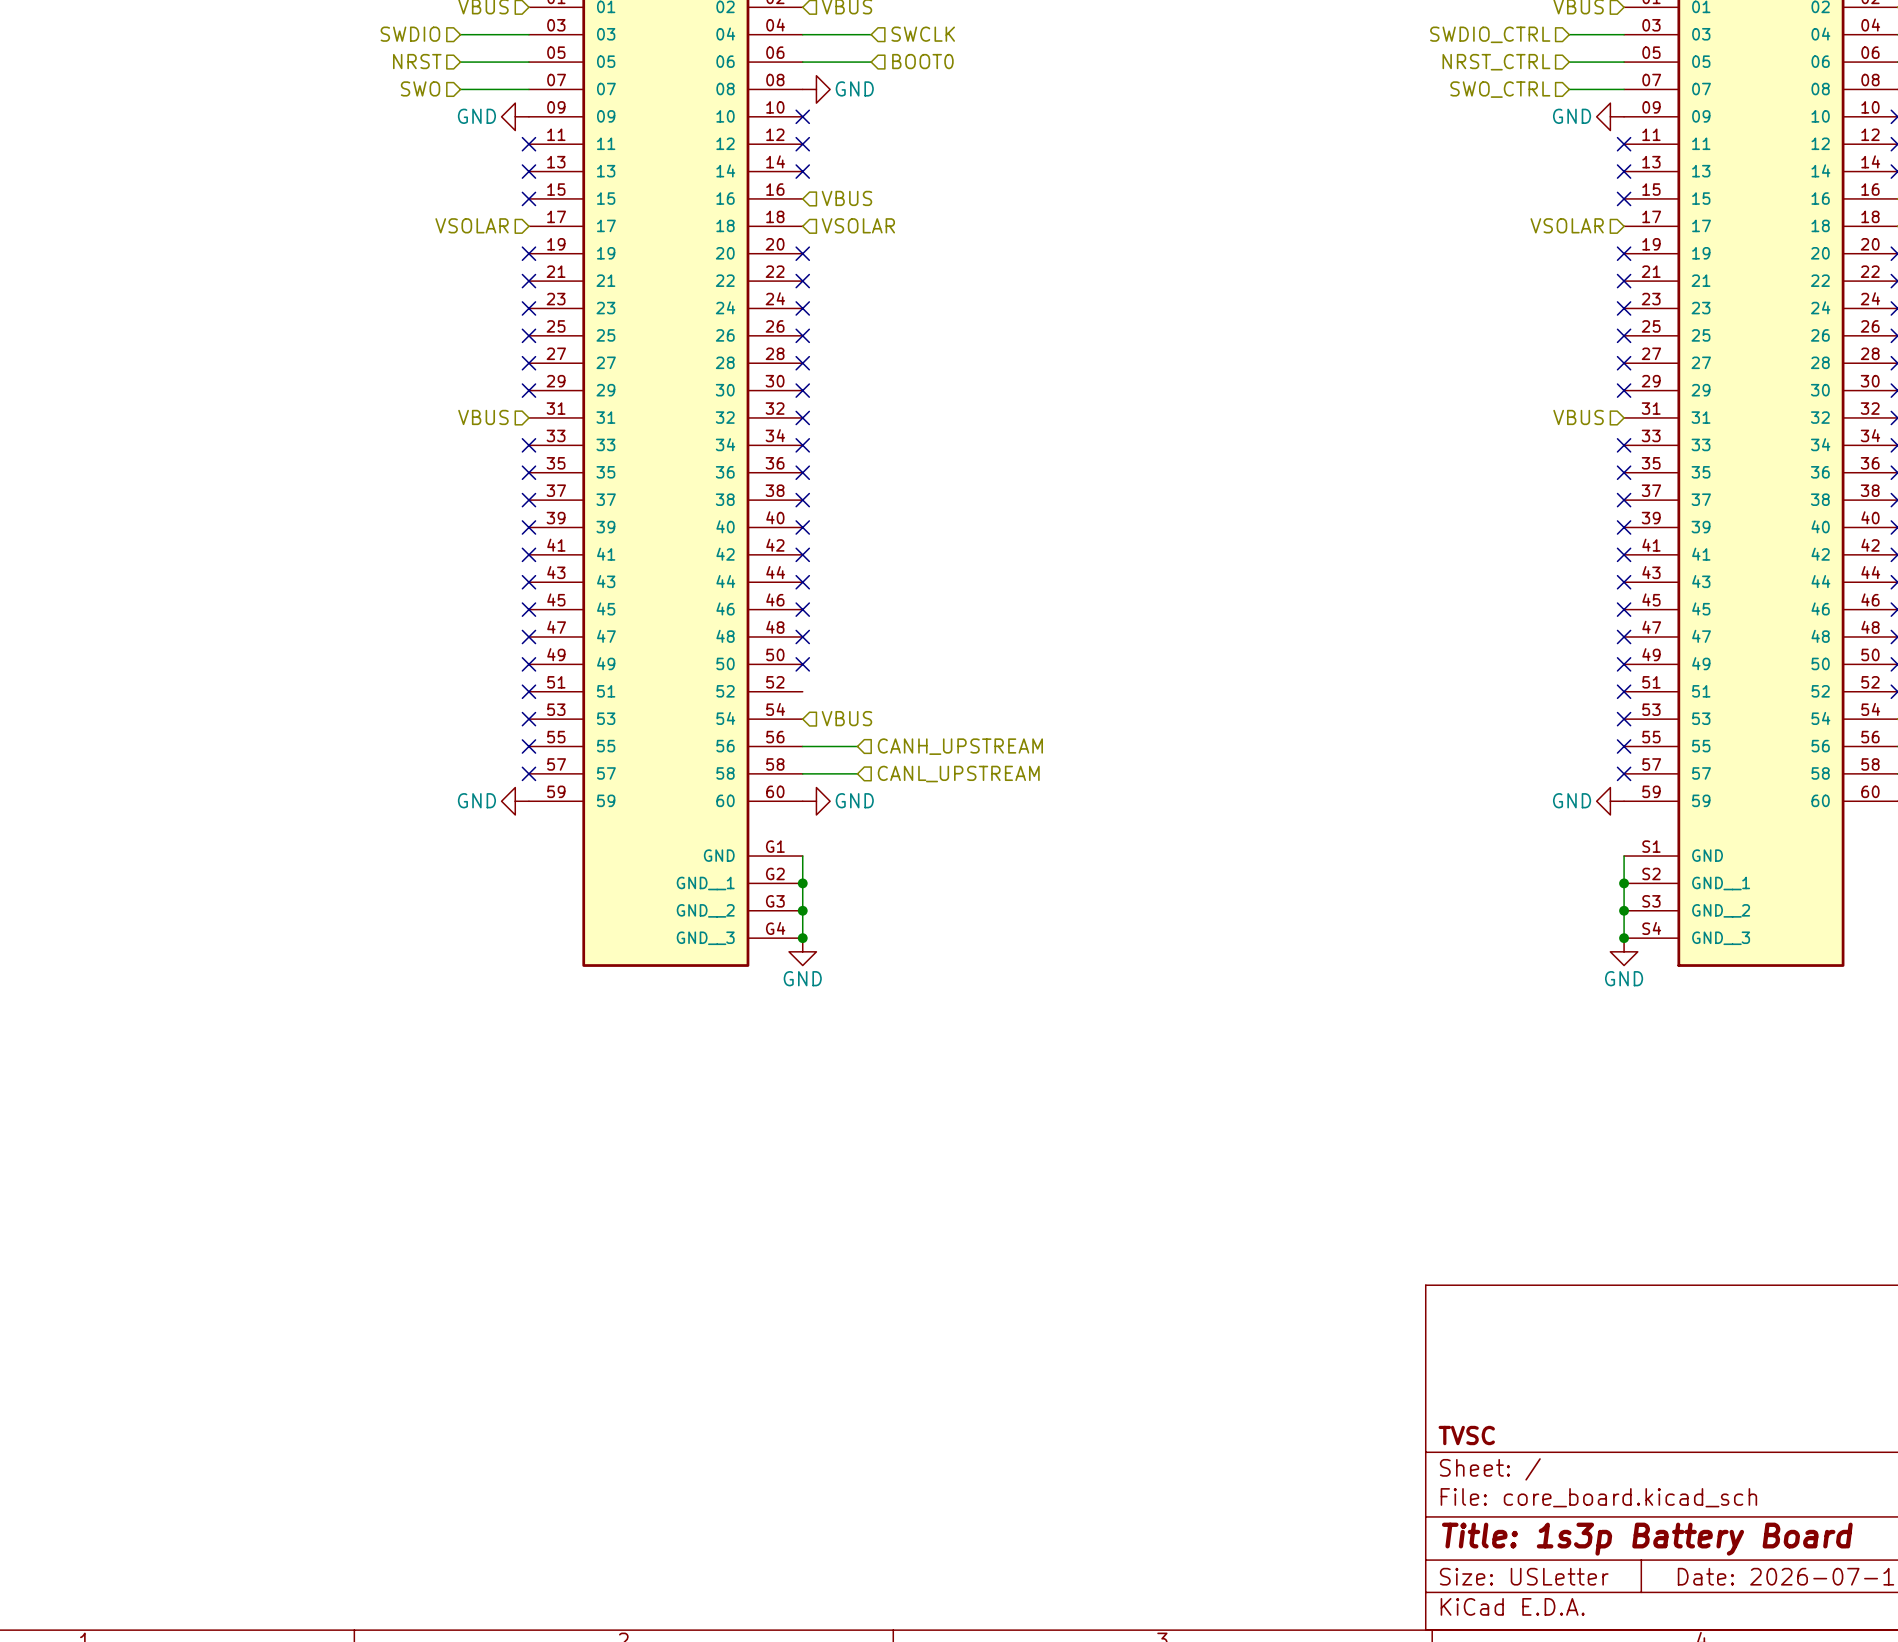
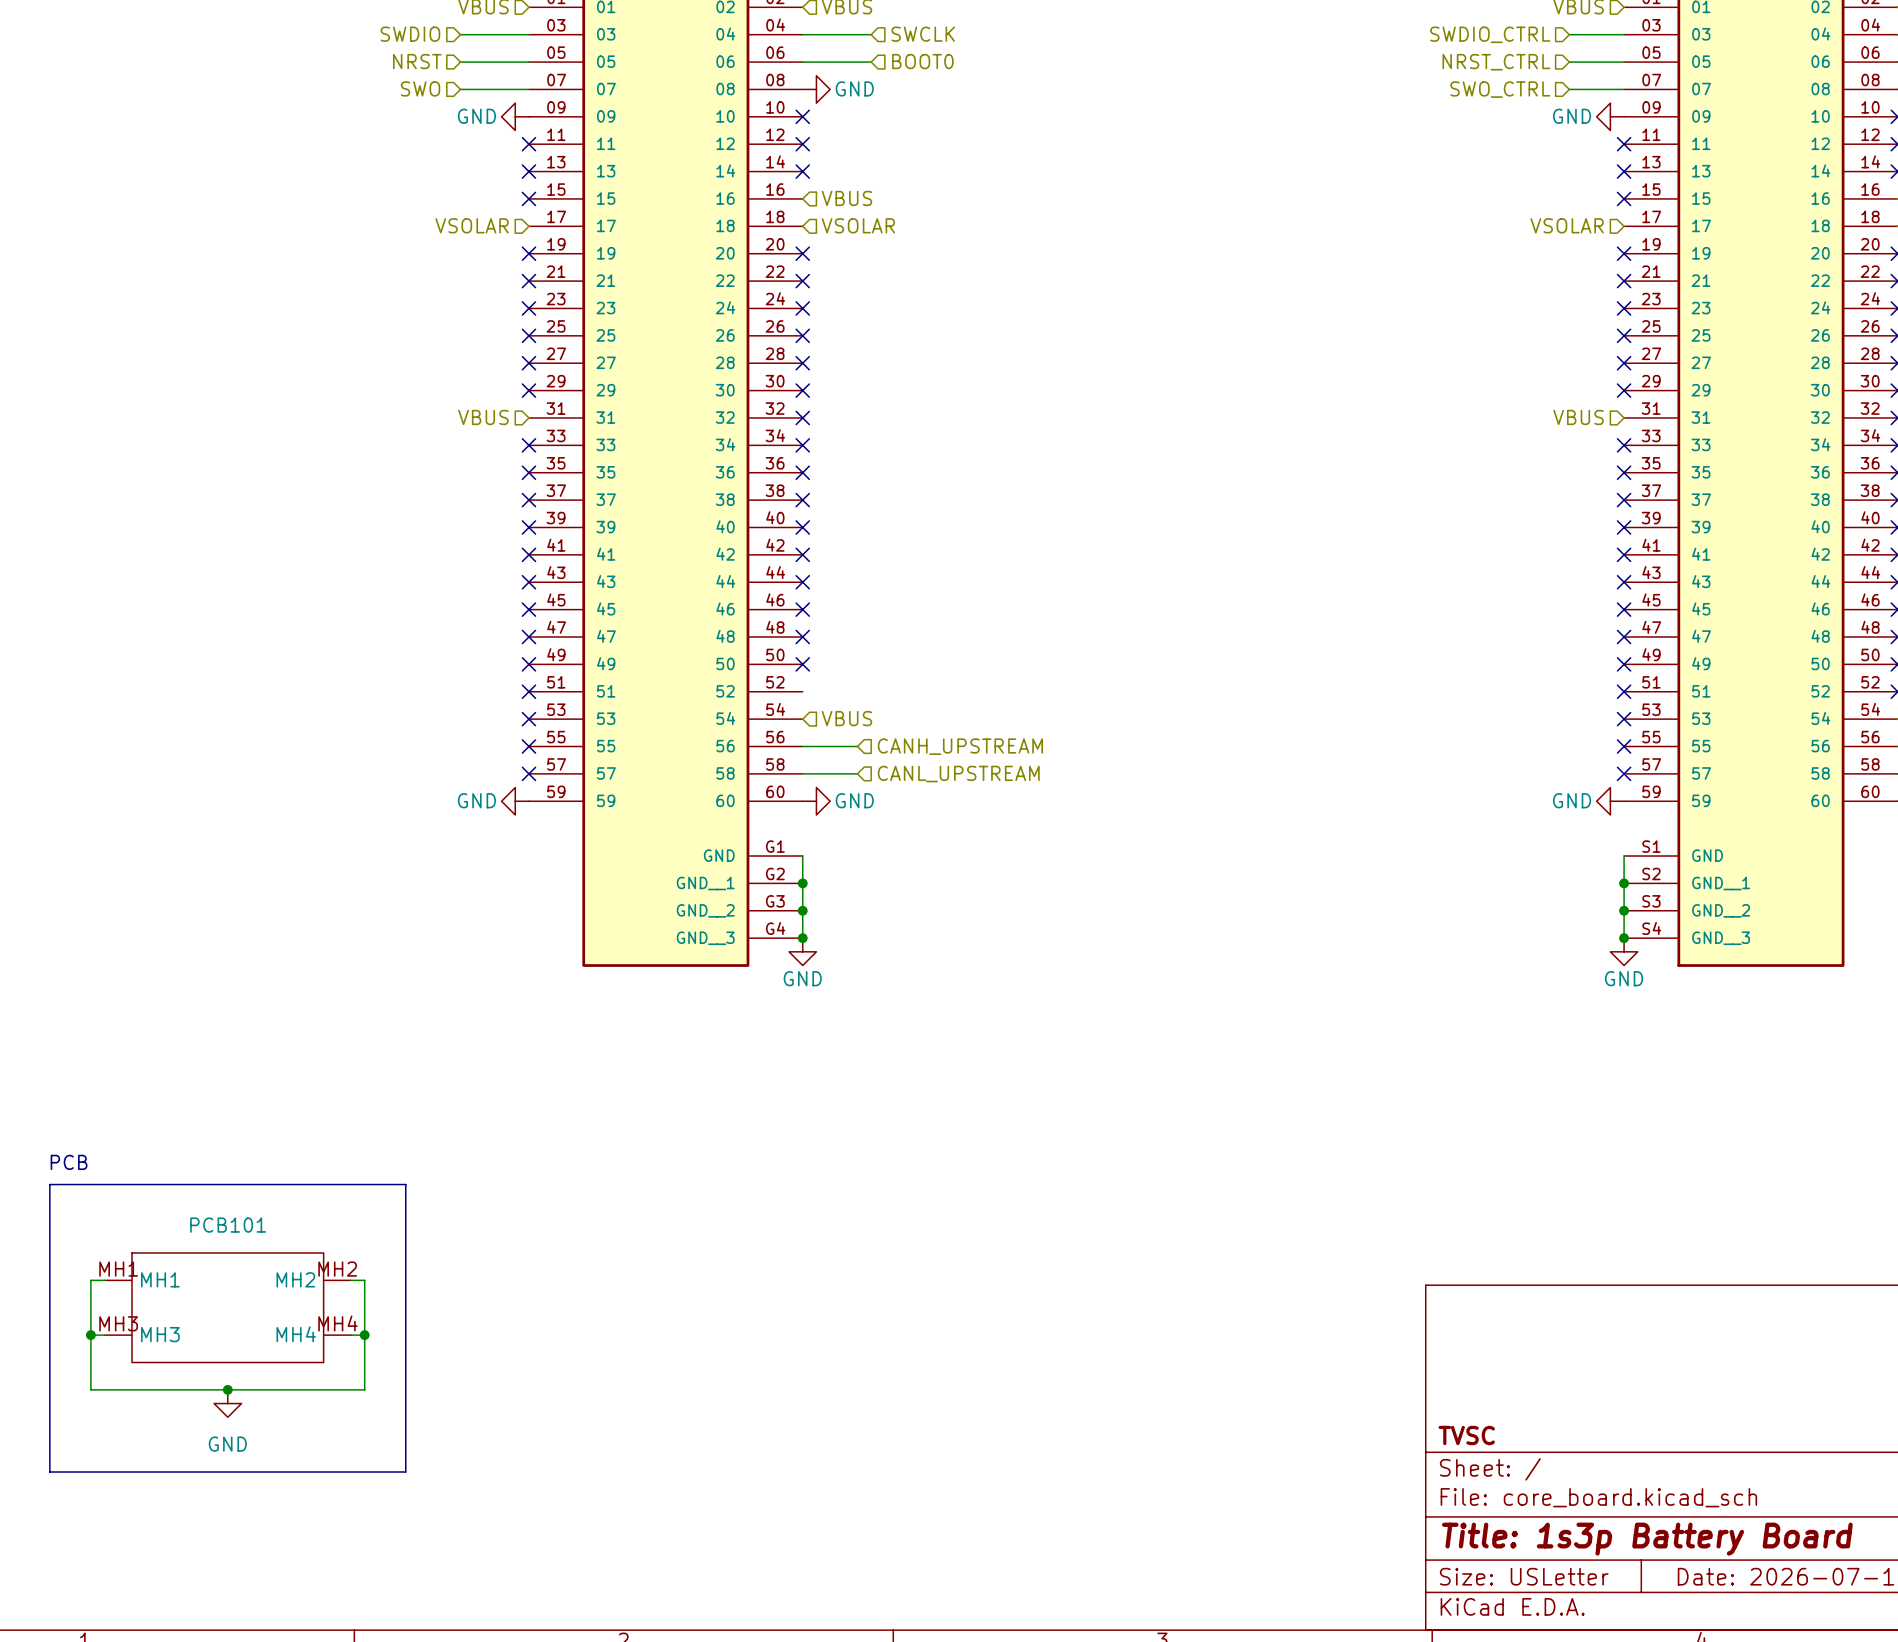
text: none -> PCB (69, 1162)
line: none -> (49, 1184) (405, 1184) (405, 1472) (49, 1472) (49, 1184)
wire: none -> (104, 1280) (90, 1280) (90, 1389) (364, 1389) (364, 1280) (351, 1280)
PCB101: none -> (227, 1307)
wire: none -> (90, 1335) (104, 1335)
junction: none -> (90, 1335)
wire: none -> (351, 1335) (364, 1335)
junction: none -> (364, 1335)
junction: none -> (227, 1389)
power symbol: none -> GND (227, 1403)

